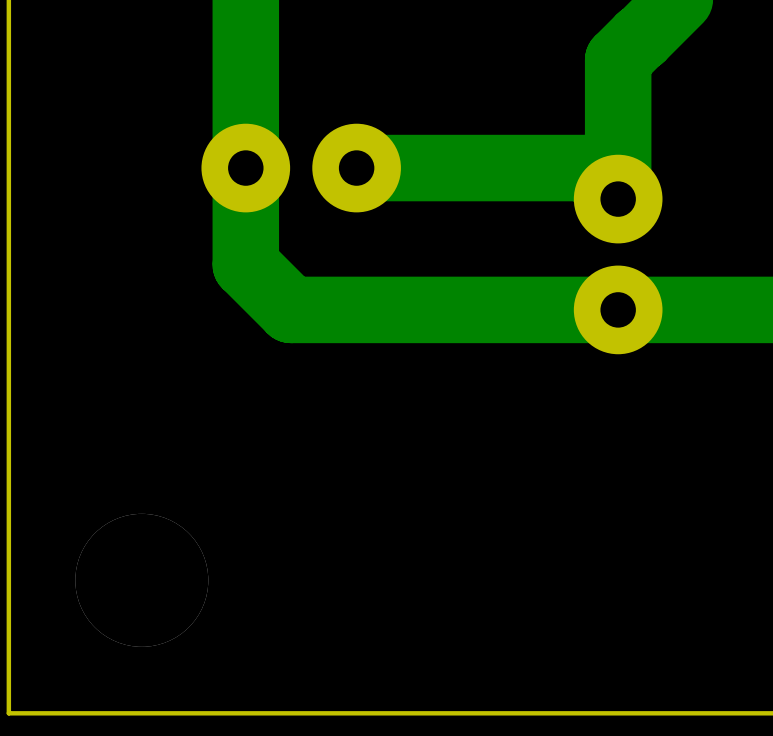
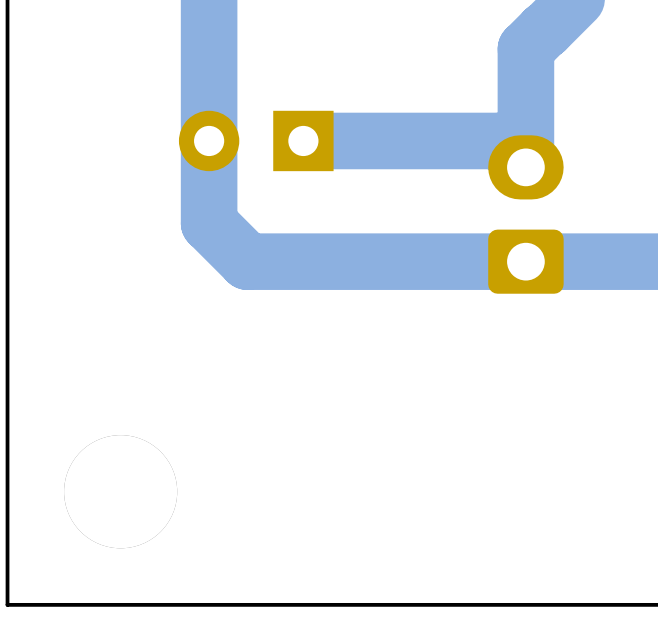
part footprint: [201, 123, 401, 213] -> [178, 110, 334, 172]
part footprint: [573, 154, 663, 355] -> [488, 135, 564, 294]

